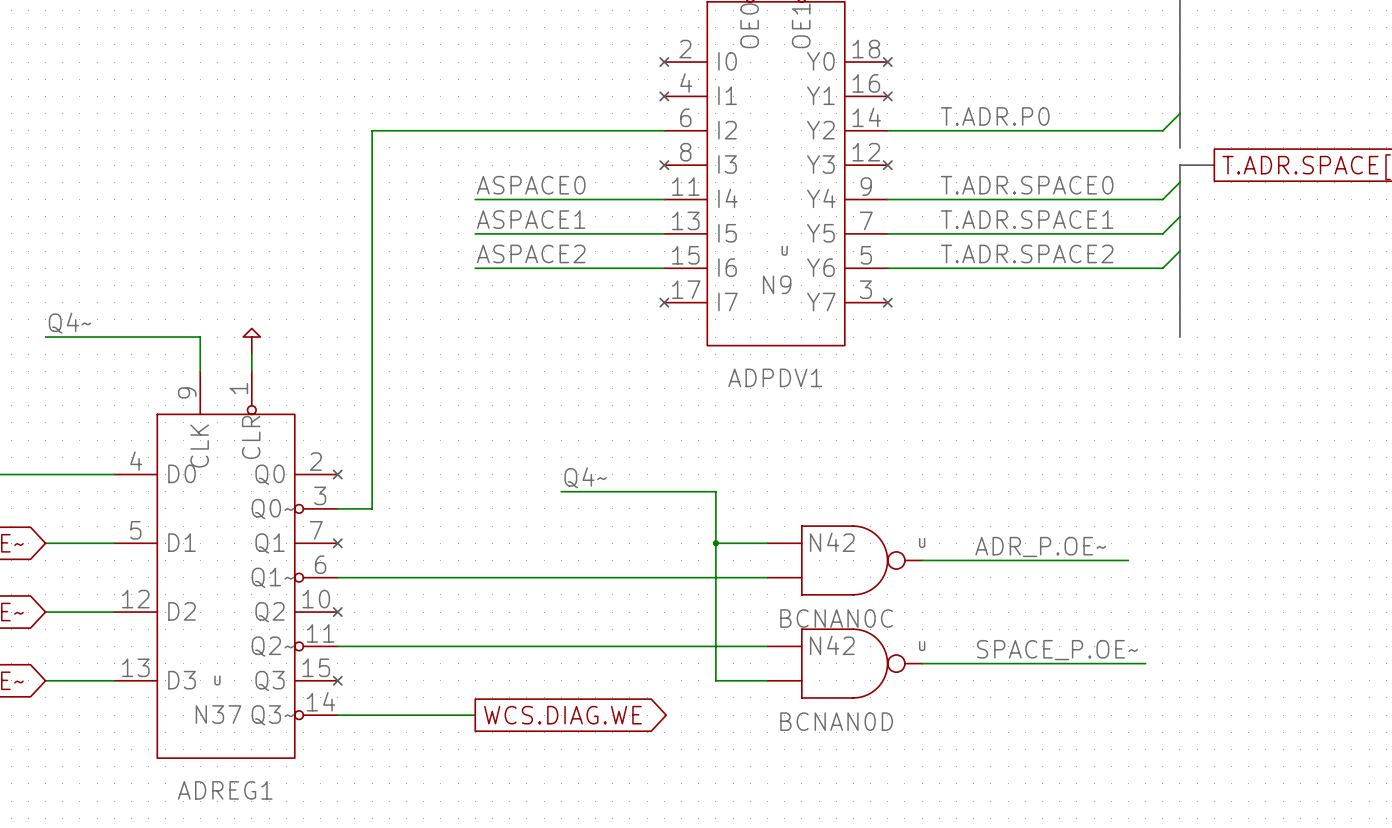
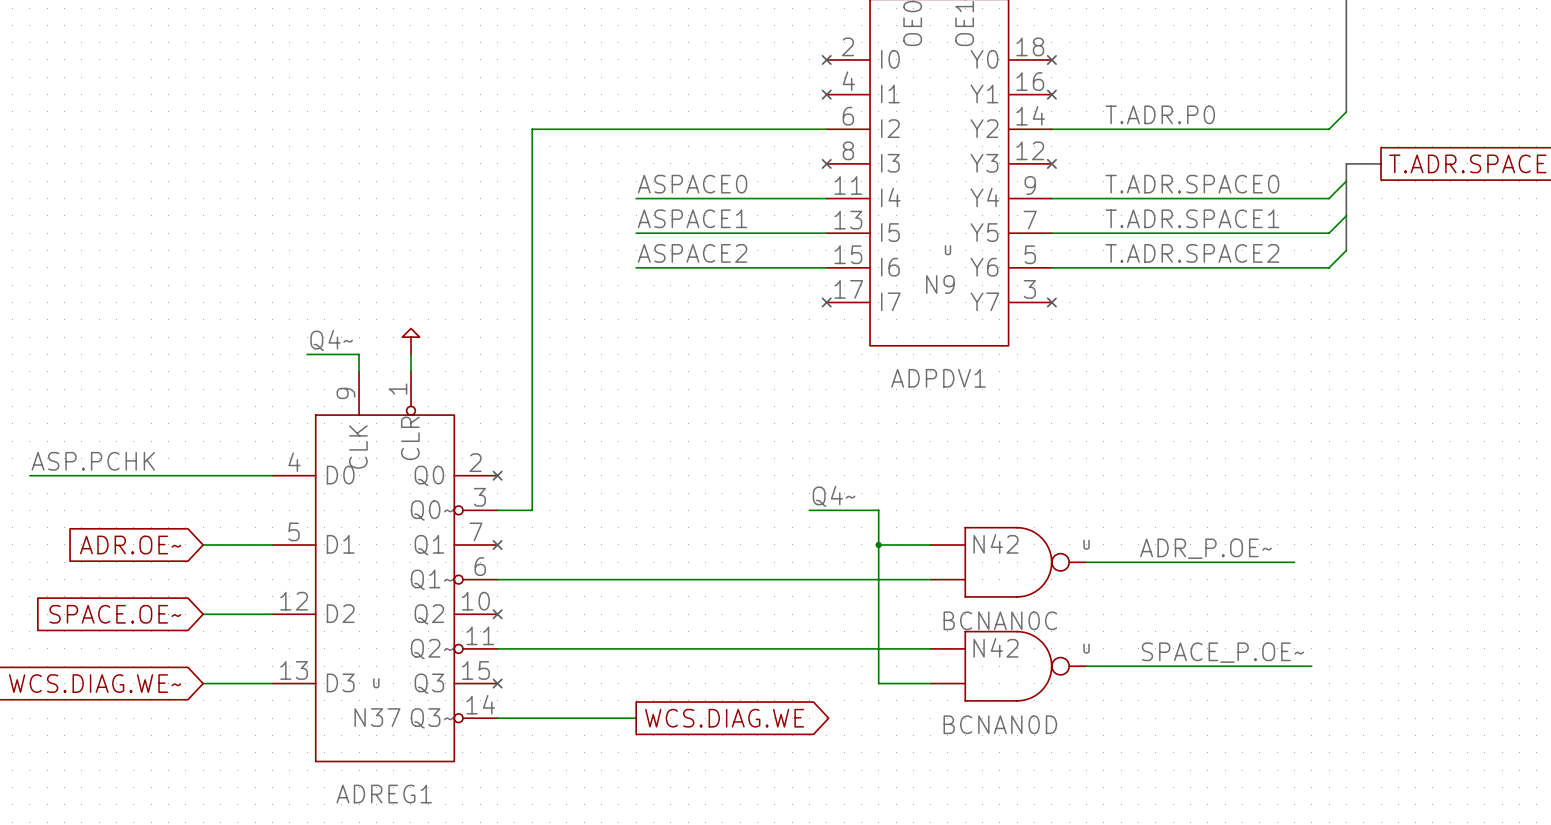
bus: (1179, 113) (1179, 147) -> none
bus: (1179, 251) (1179, 337) -> none
label position: Q4~ (69, 323) -> Q4~ (331, 340)
wire: (45, 337) (200, 337) (200, 354) -> (307, 354) (359, 354)
label position: Q4~ (585, 477) -> Q4~ (833, 496)
wire: (561, 491) (715, 491) (715, 508) -> (809, 510) (878, 510)

